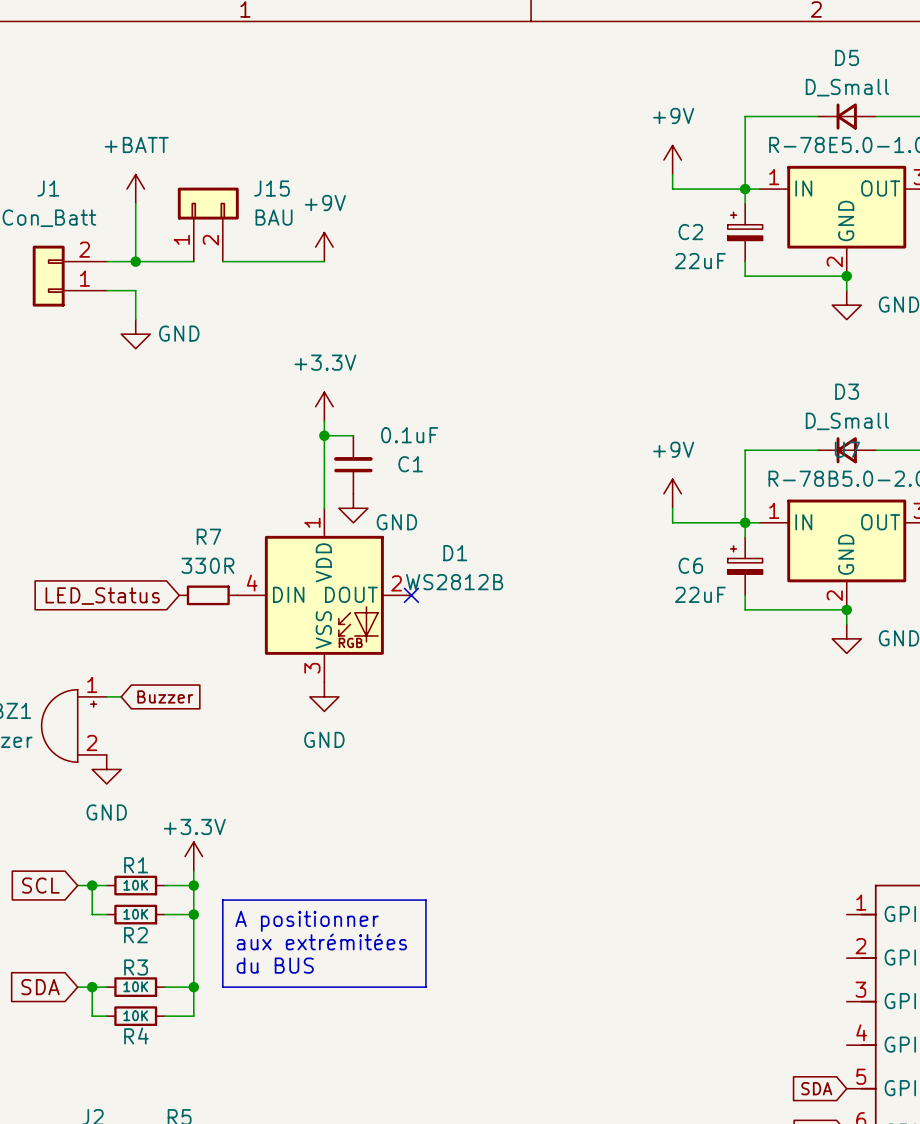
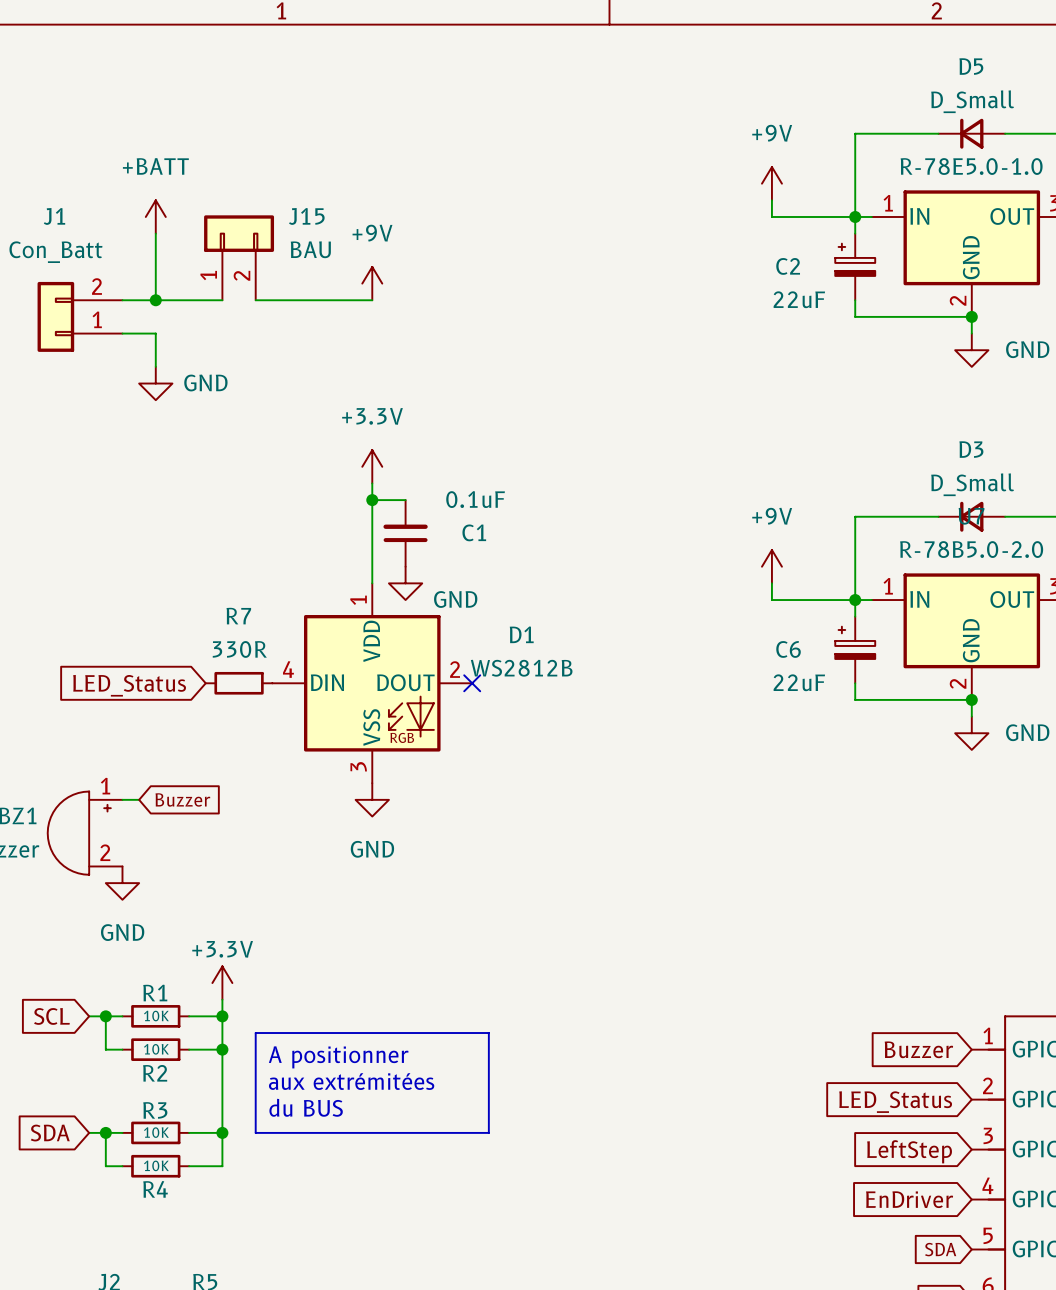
global label: none -> Buzzer (918, 1049)
global label: none -> LED_Status (895, 1102)
global label: none -> LeftStep (909, 1151)
global label: none -> EnDriver (909, 1199)

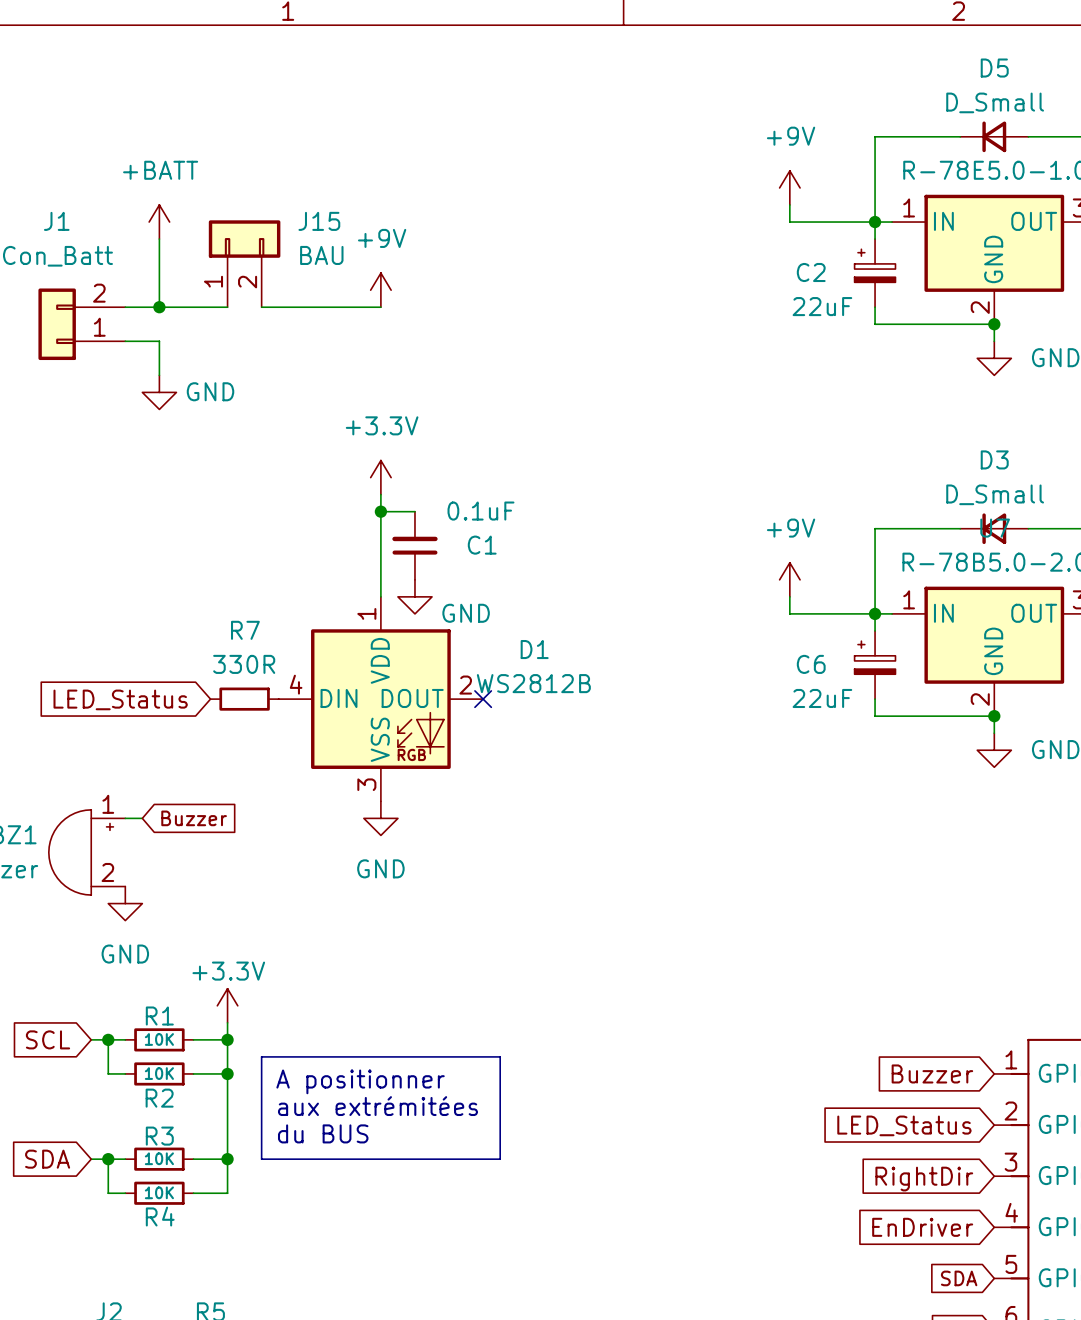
global label: LeftStep (909, 1151) -> RightDir (924, 1179)

